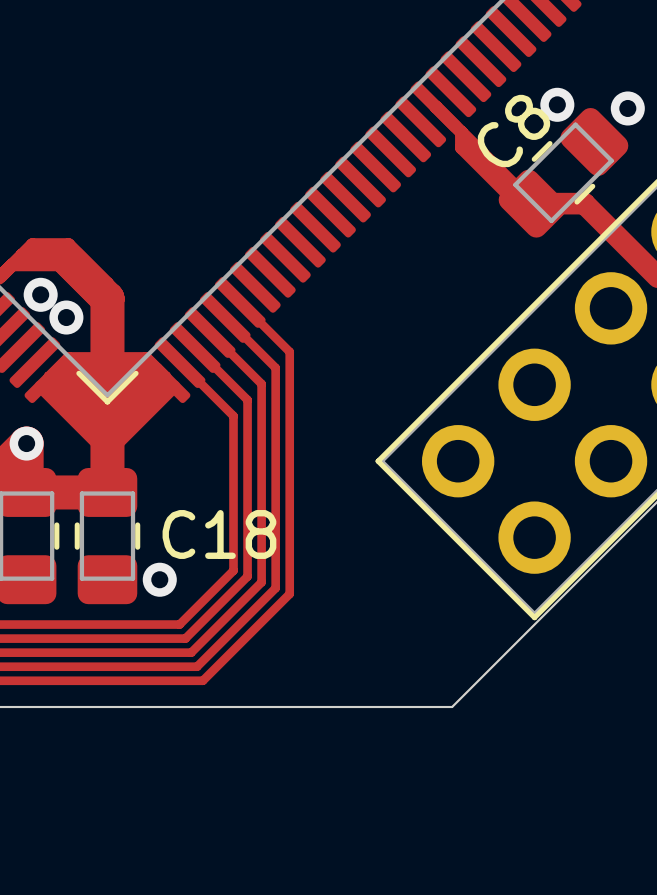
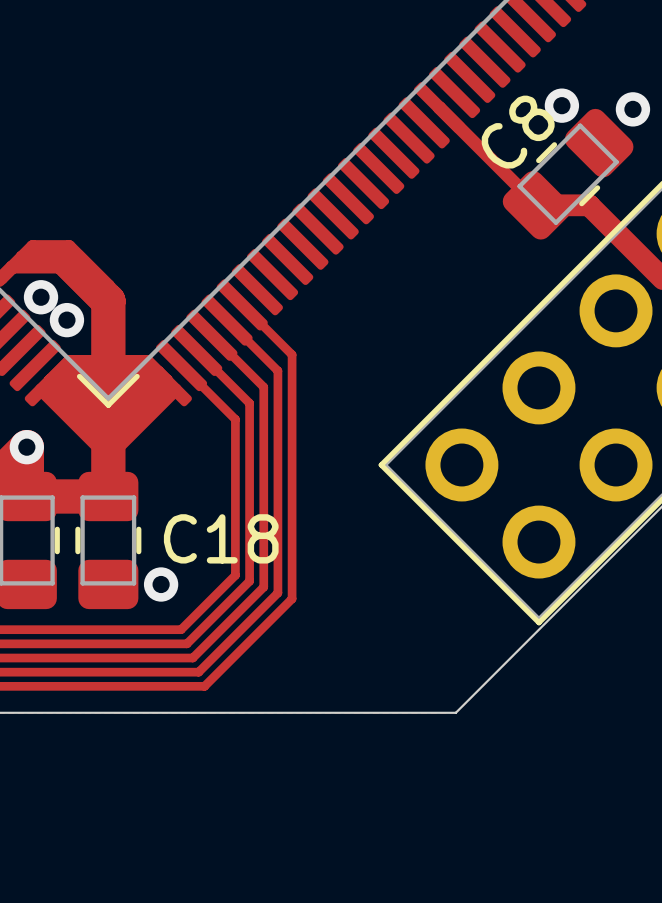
track: (461, 132) (461, 147) (517, 203) (532, 203) -> none

